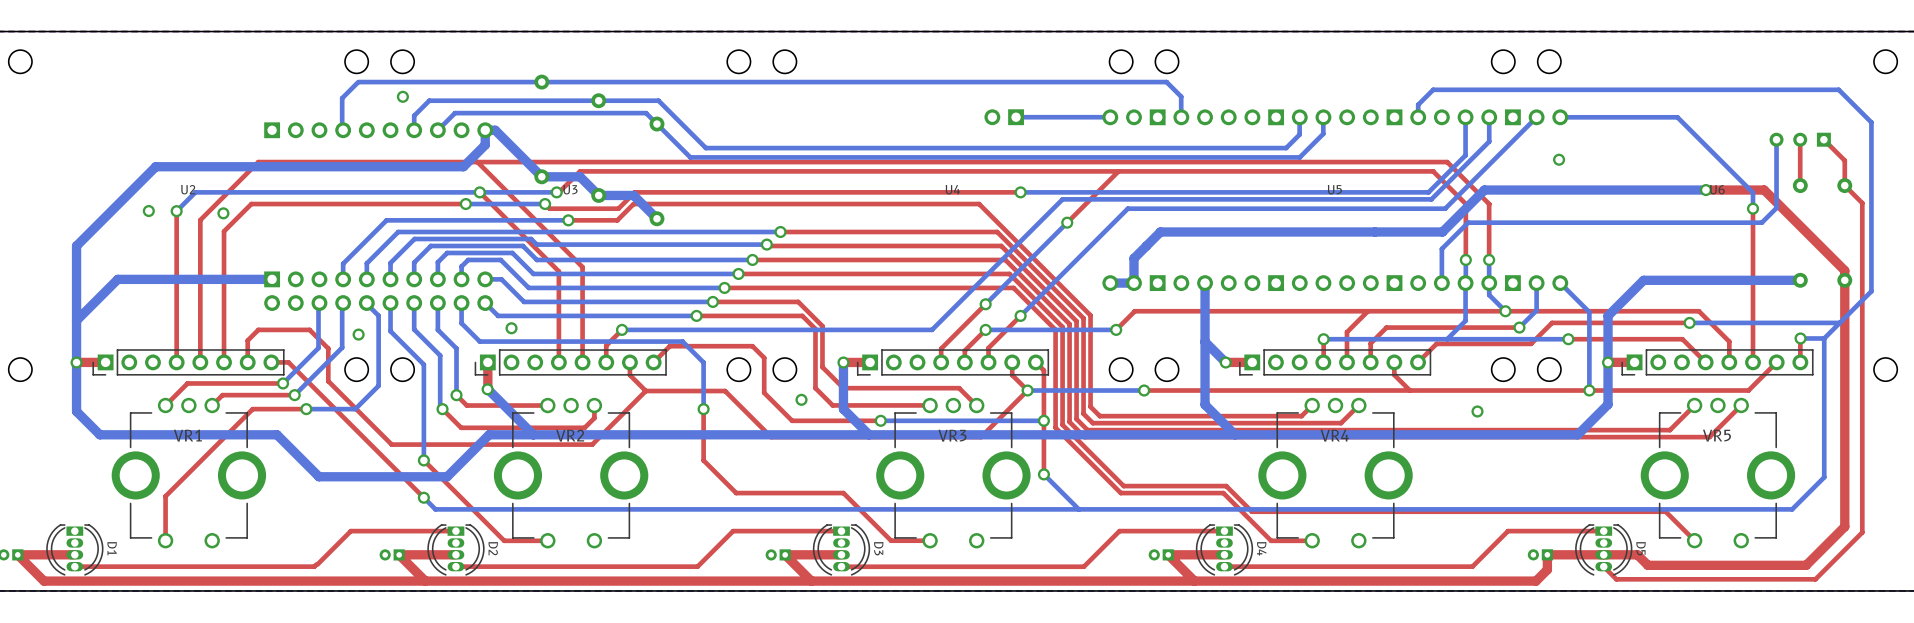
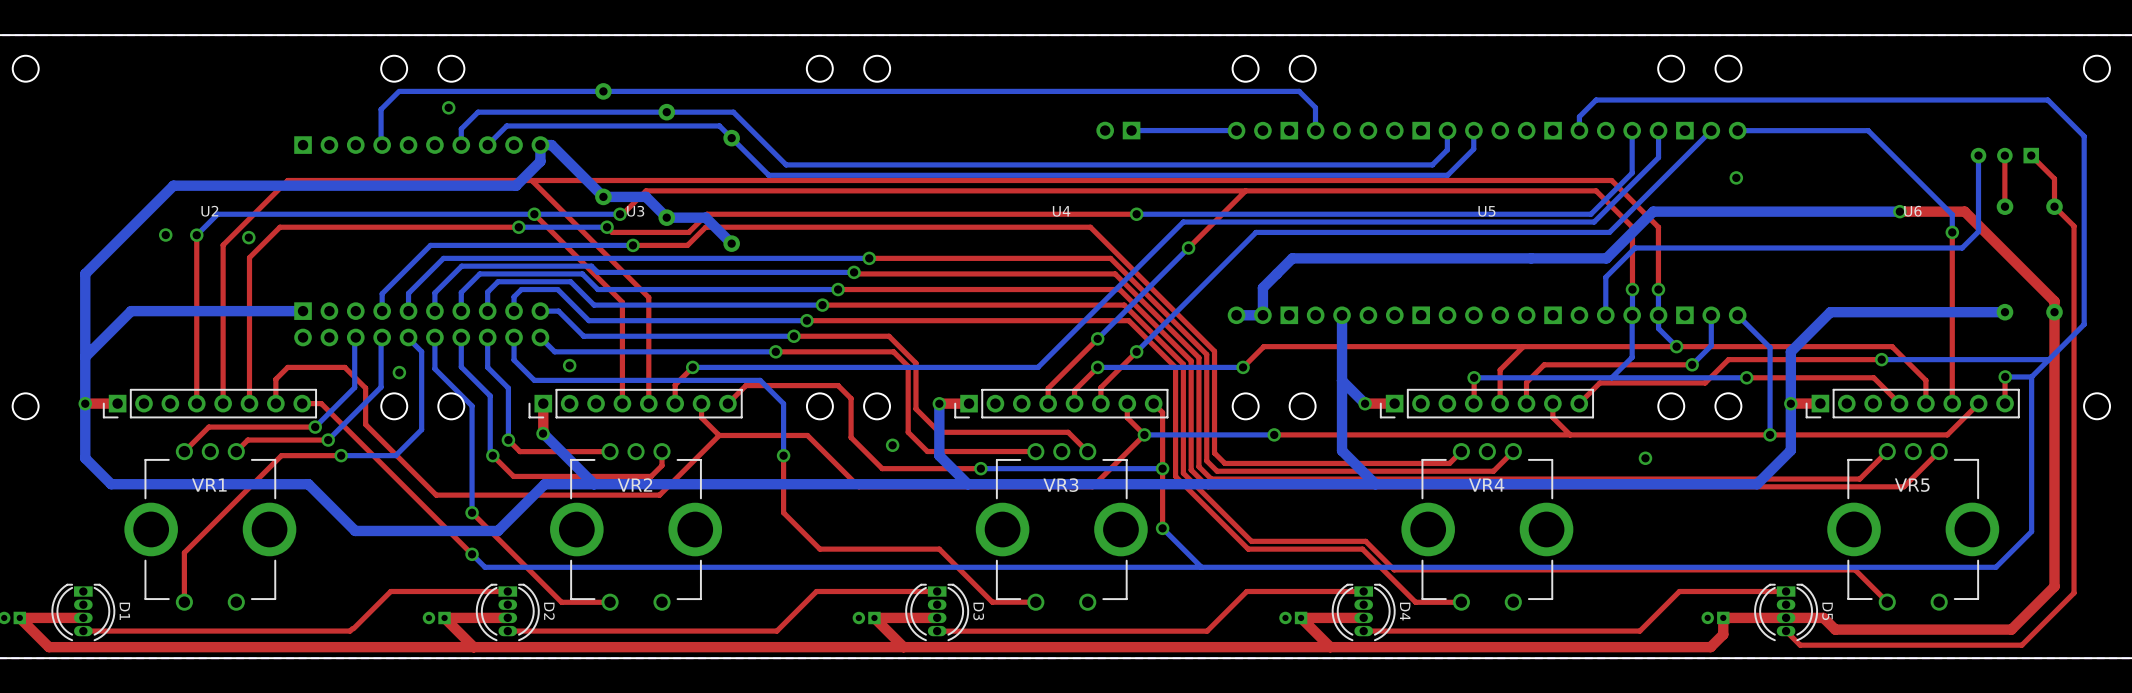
U2 footprint: [8, 50, 369, 382] -> [12, 55, 408, 420]
U3 footprint: [390, 50, 751, 382] -> [438, 55, 833, 420]
U4 footprint: [773, 50, 1133, 382] -> [864, 55, 1259, 420]
U5 footprint: [1155, 50, 1515, 382] -> [1289, 55, 1685, 420]
U6 footprint: [1537, 50, 1898, 382] -> [1715, 55, 2111, 420]

